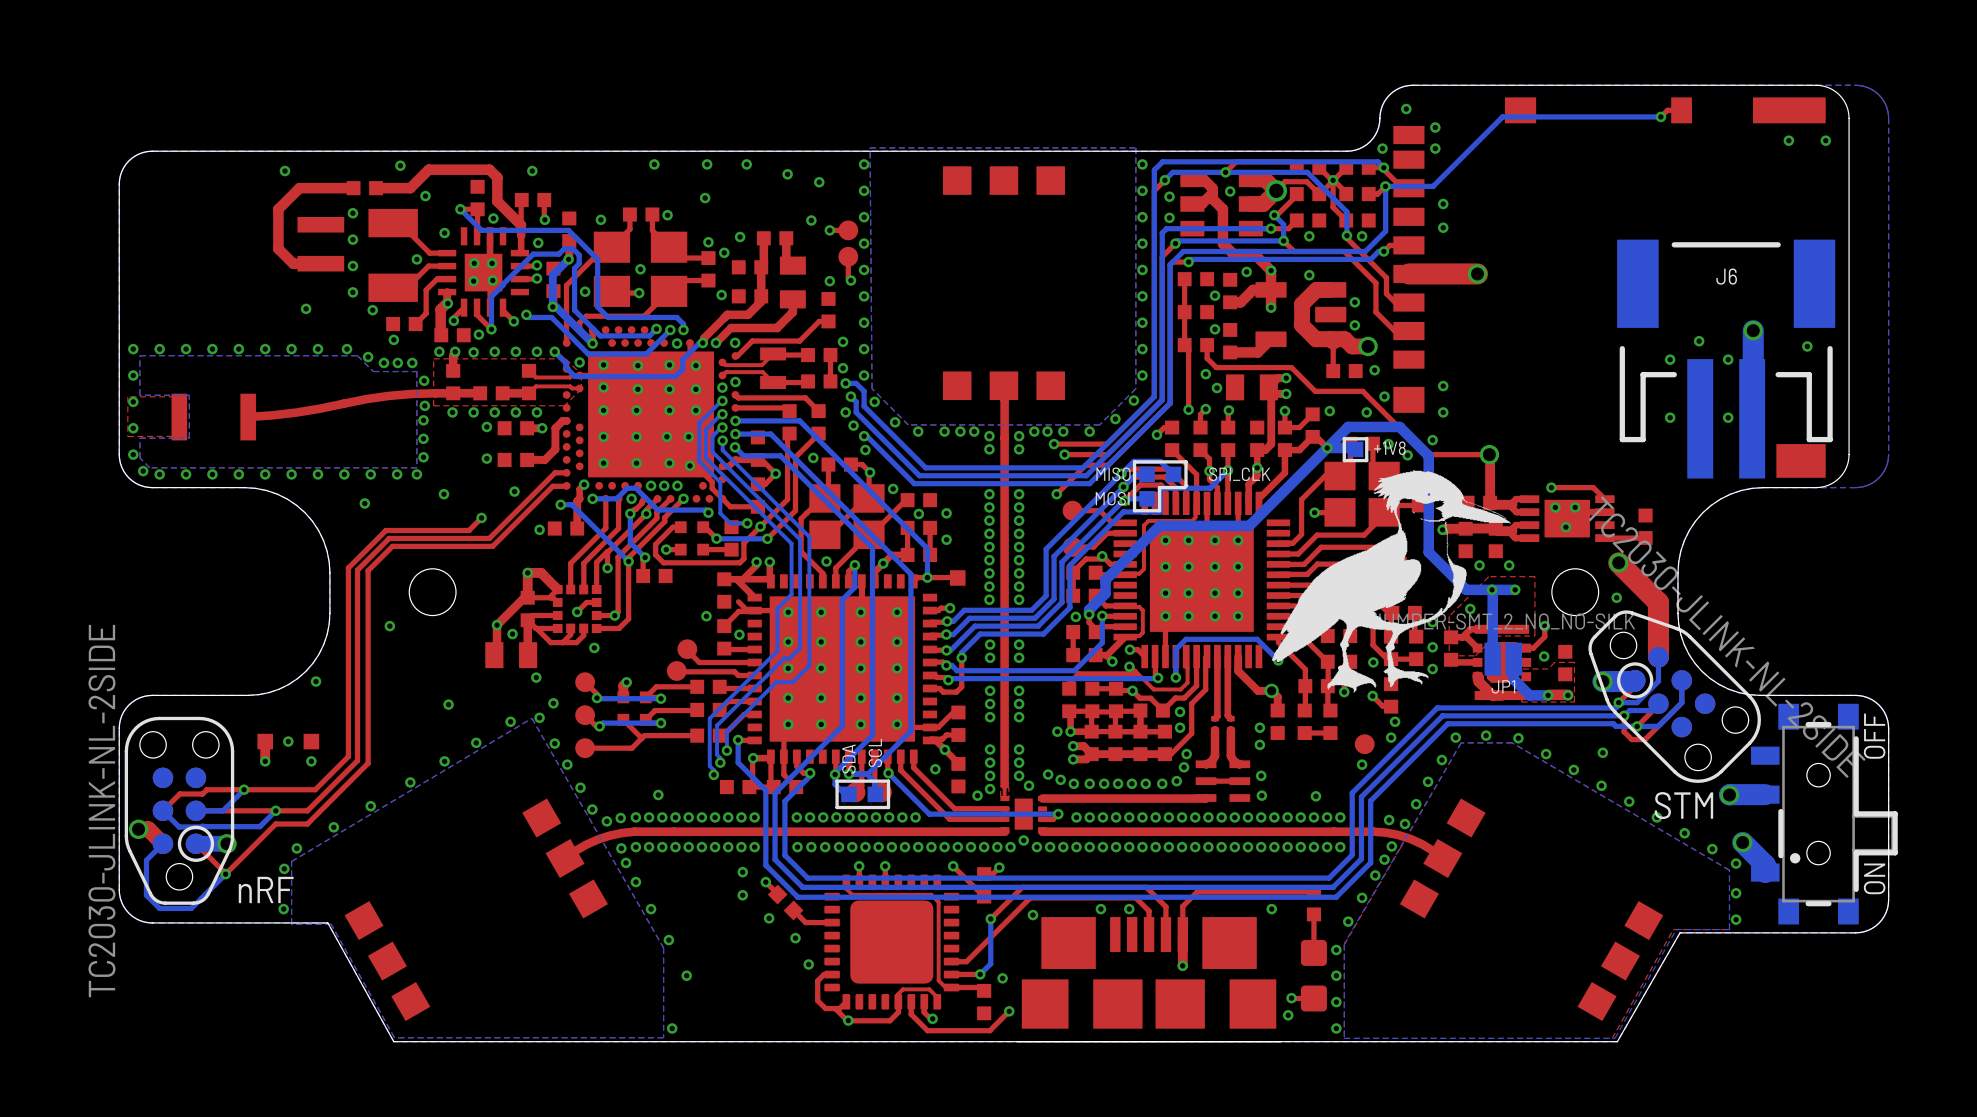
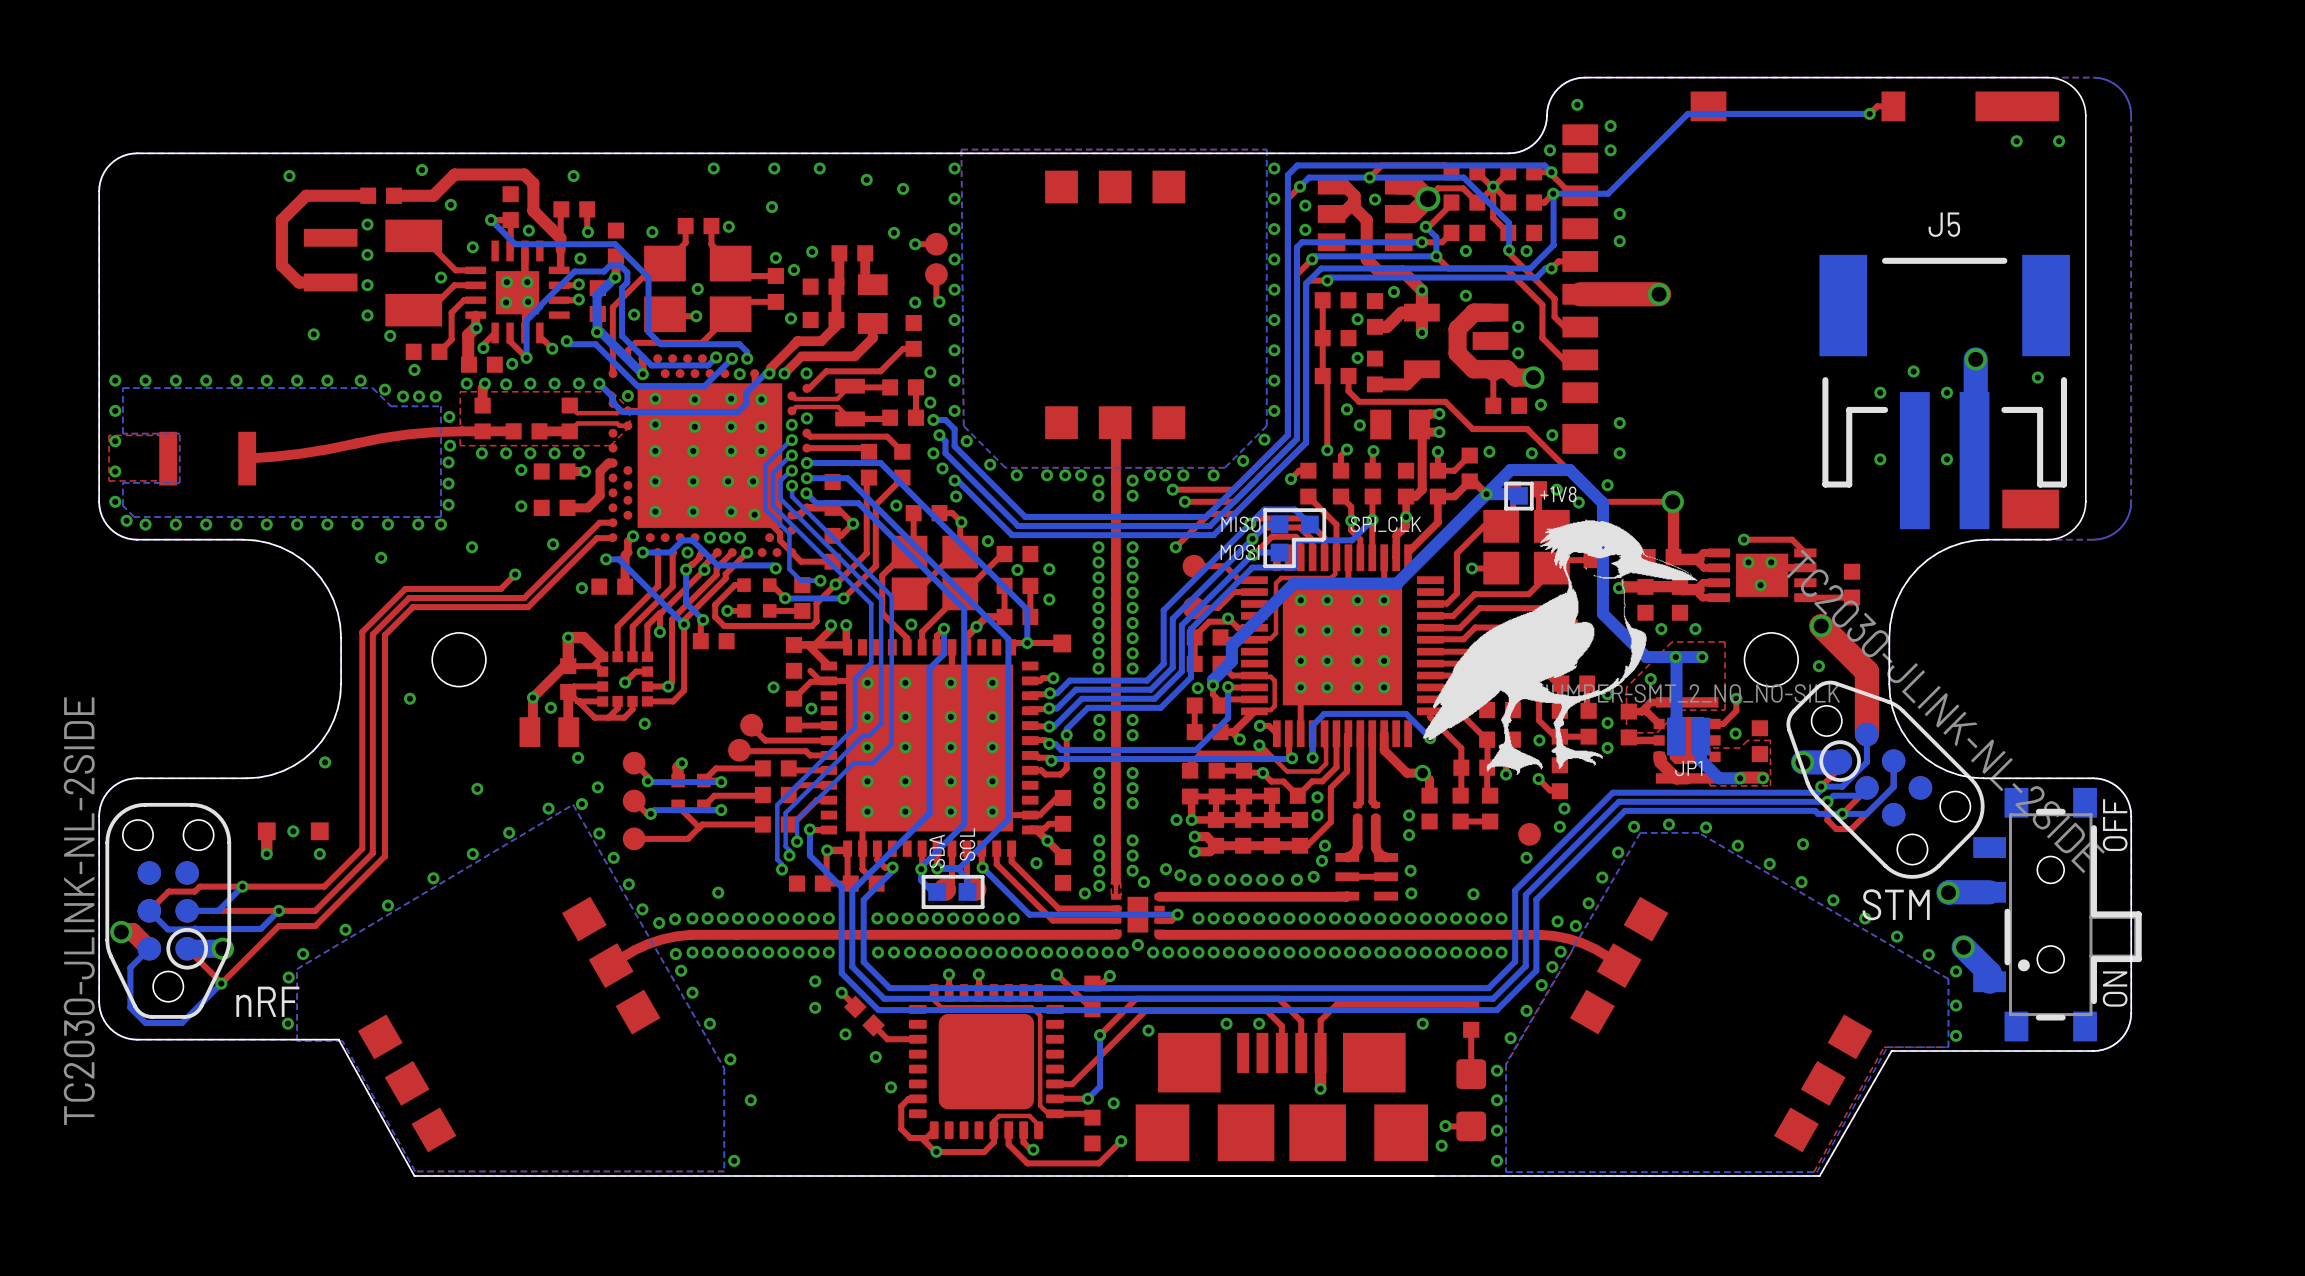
J6 name: J6 (1726, 276) -> J5 (1944, 224)

